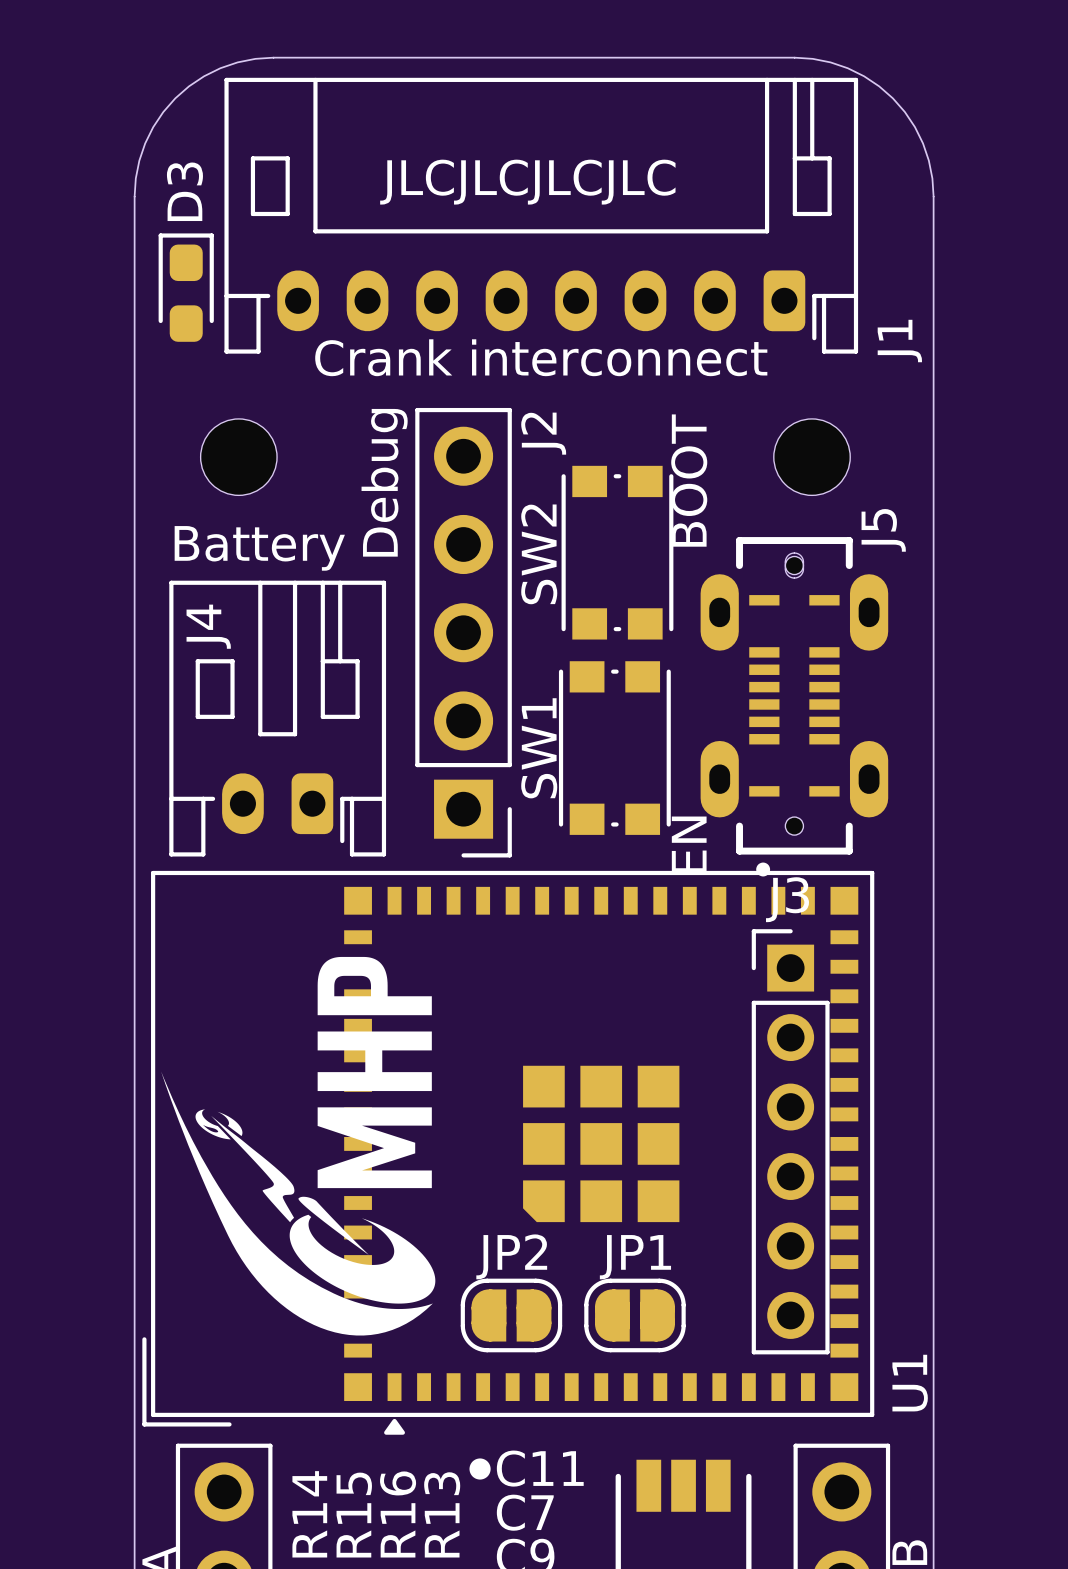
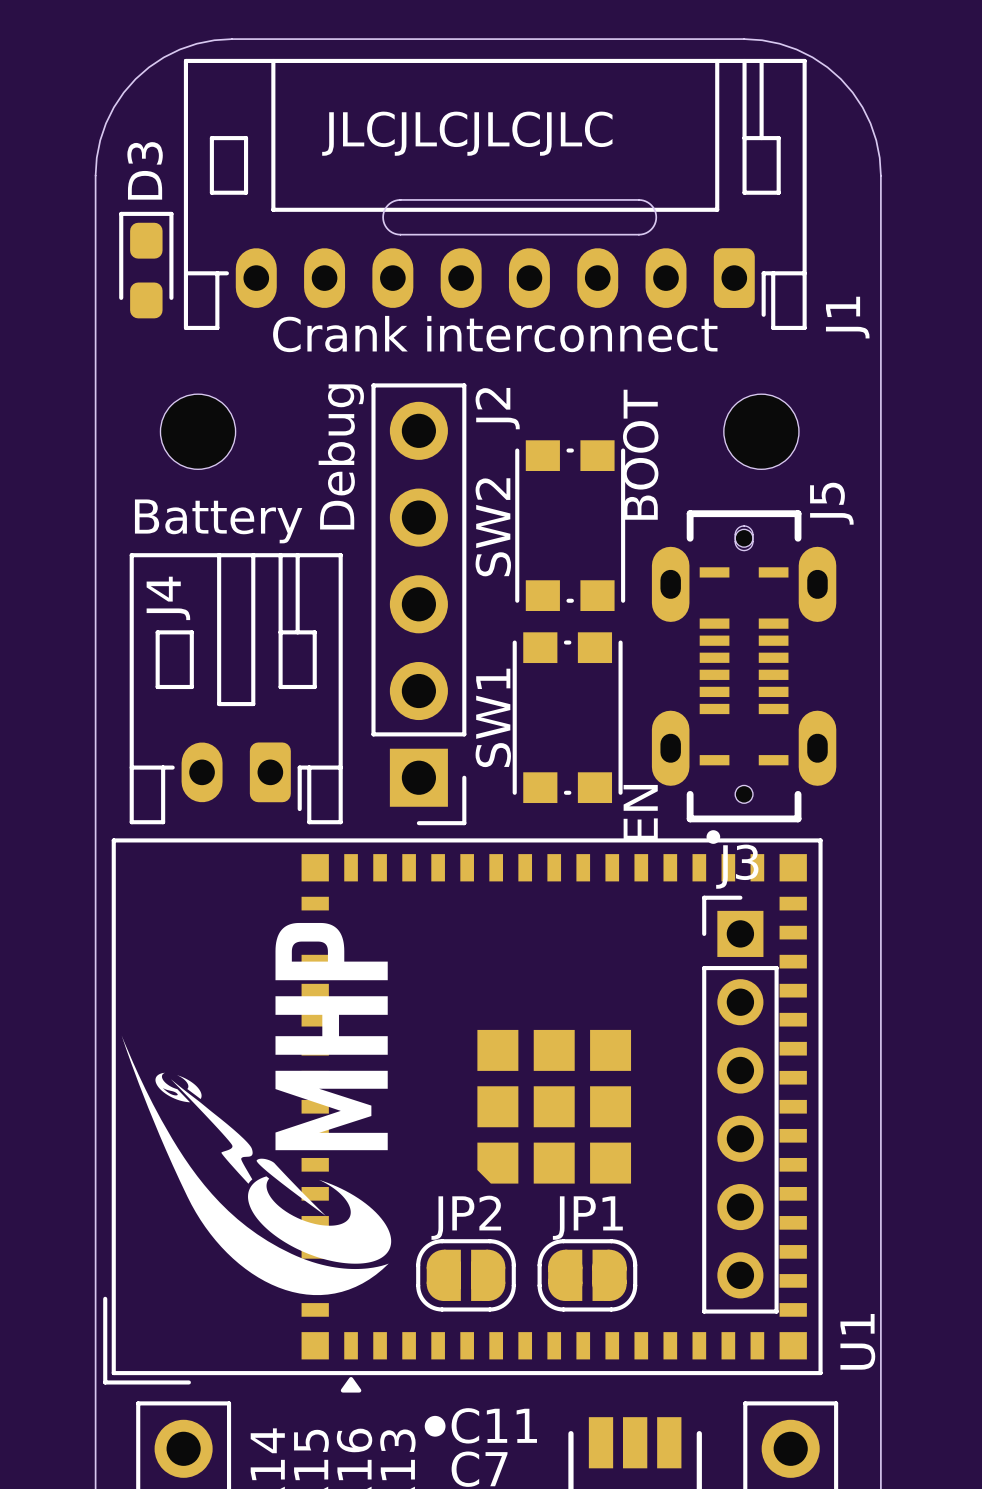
text position: JLCJLCJLCJLC (527, 182) -> JLCJLCJLCJLC (467, 133)
board edge: none -> (400, 199) (641, 200) (652, 206) (656, 219) (651, 229) (638, 234) (398, 234) (386, 227) (383, 217) (388, 205) (400, 199)

